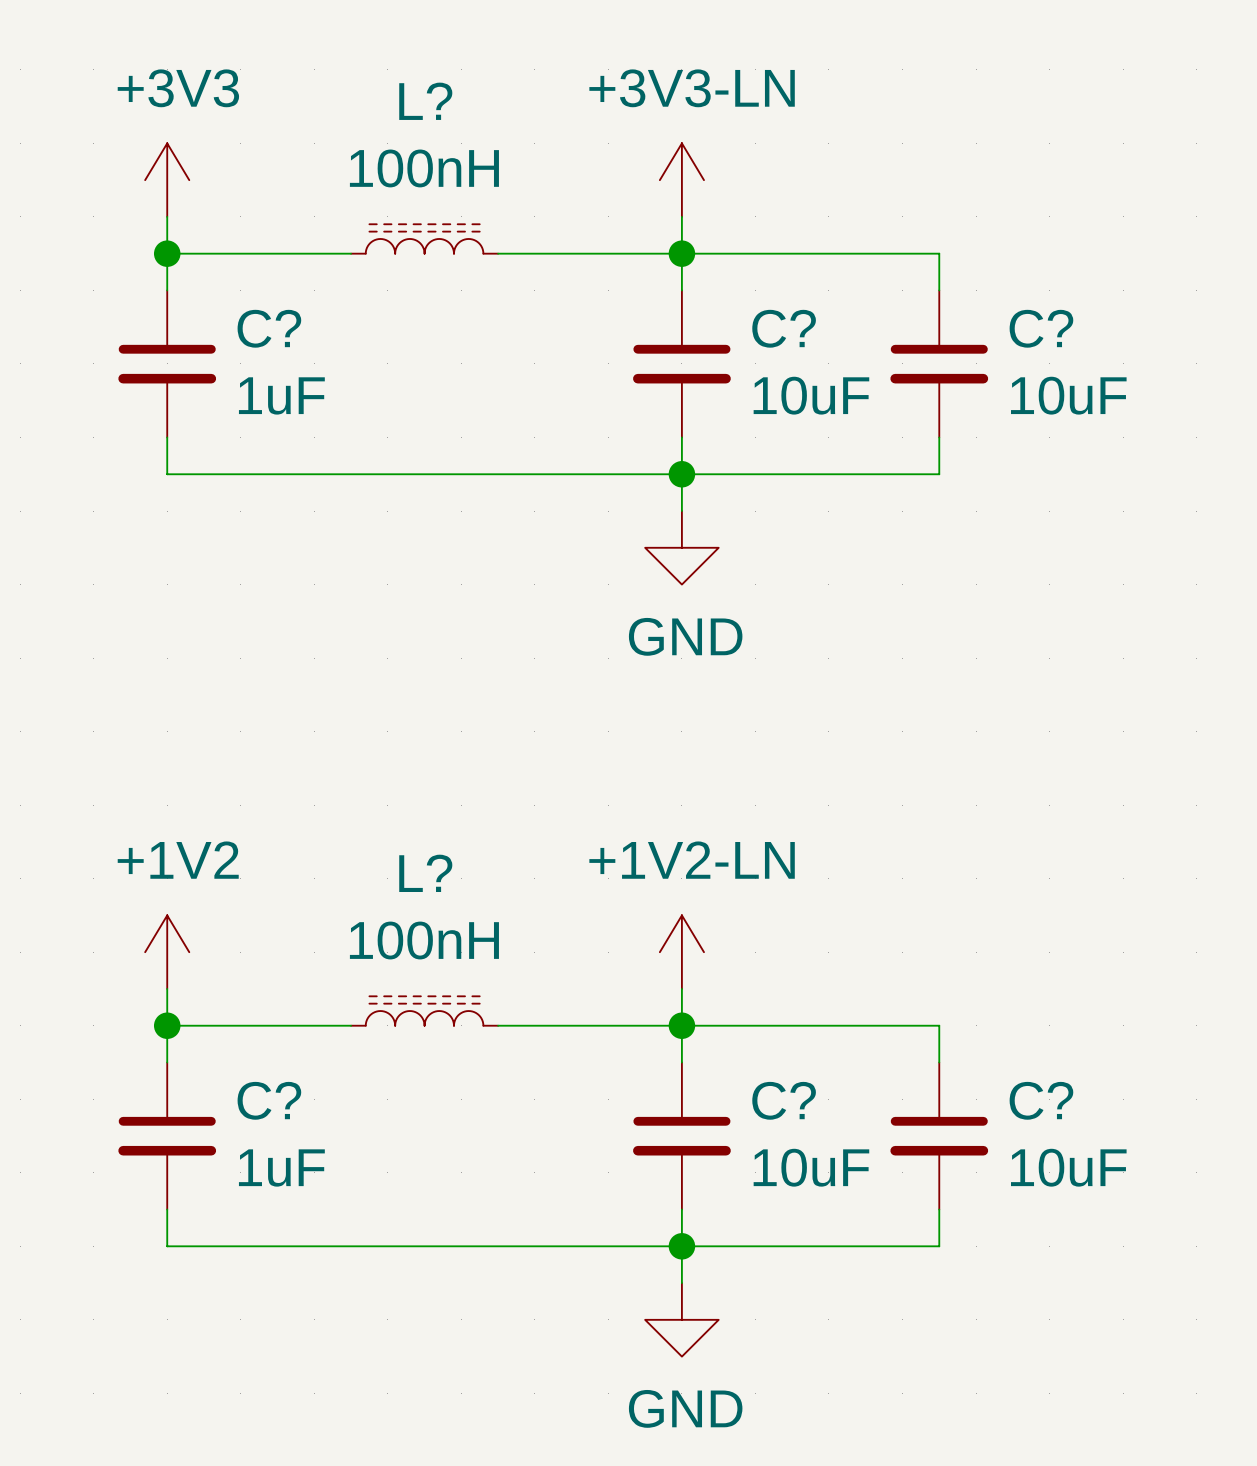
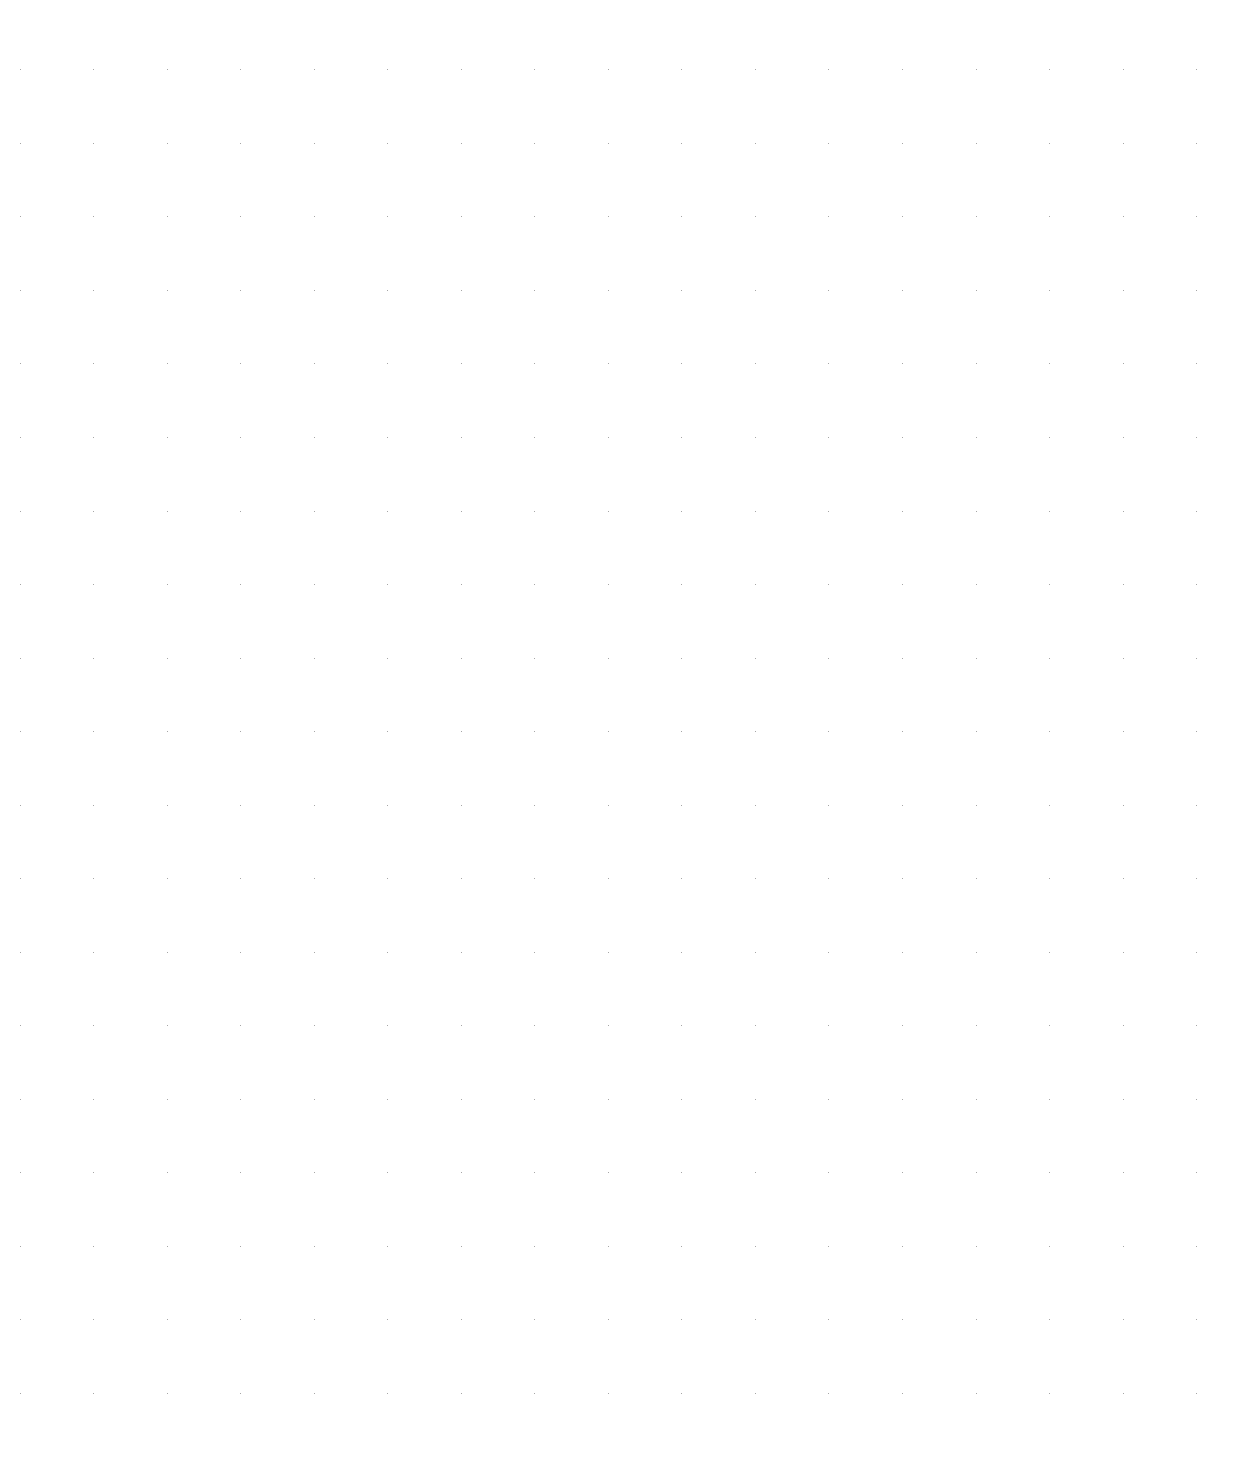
power symbol: +3V3 (167, 180) -> none
power symbol: +3V3-LN (681, 180) -> none
wire: (167, 216) (167, 290) -> none
wire: (681, 216) (681, 290) -> none
L?: 100nH (424, 238) -> none
wire: (167, 253) (351, 253) -> none
junction: (167, 253) -> none
wire: (498, 253) (939, 253) (939, 290) -> none
junction: (681, 253) -> none
C?: 1uF (167, 363) -> none
C?: 10uF (681, 363) -> none
C?: 10uF (939, 363) -> none
wire: (167, 437) (167, 474) (939, 474) (939, 437) -> none
wire: (681, 437) (681, 511) -> none
junction: (681, 474) -> none
power symbol: GND (681, 547) -> none
power symbol: +1V2 (167, 952) -> none
power symbol: +1V2-LN (681, 952) -> none
wire: (167, 988) (167, 1062) -> none
wire: (681, 988) (681, 1062) -> none
L?: 100nH (424, 1011) -> none
wire: (167, 1025) (351, 1025) -> none
junction: (167, 1025) -> none
wire: (498, 1025) (939, 1025) (939, 1062) -> none
junction: (681, 1025) -> none
C?: 1uF (167, 1136) -> none
C?: 10uF (681, 1136) -> none
C?: 10uF (939, 1136) -> none
wire: (167, 1209) (167, 1246) (939, 1246) (939, 1209) -> none
wire: (681, 1209) (681, 1283) -> none
junction: (681, 1246) -> none
power symbol: GND (681, 1319) -> none

